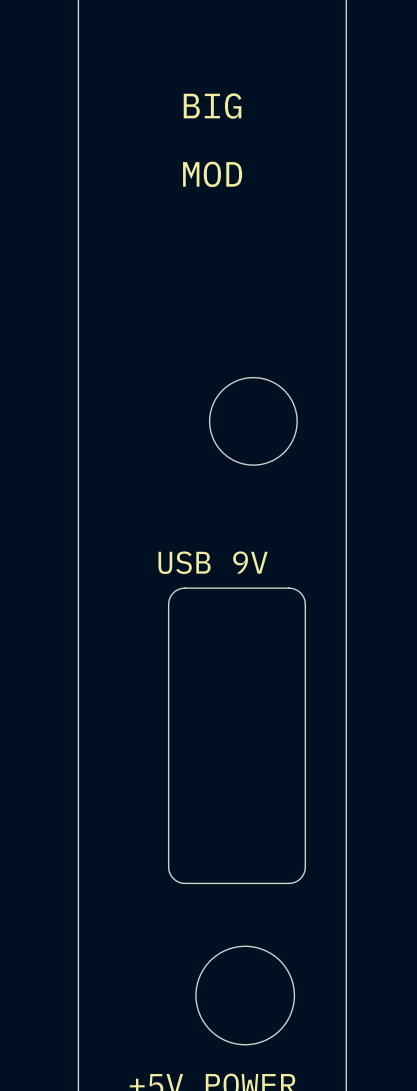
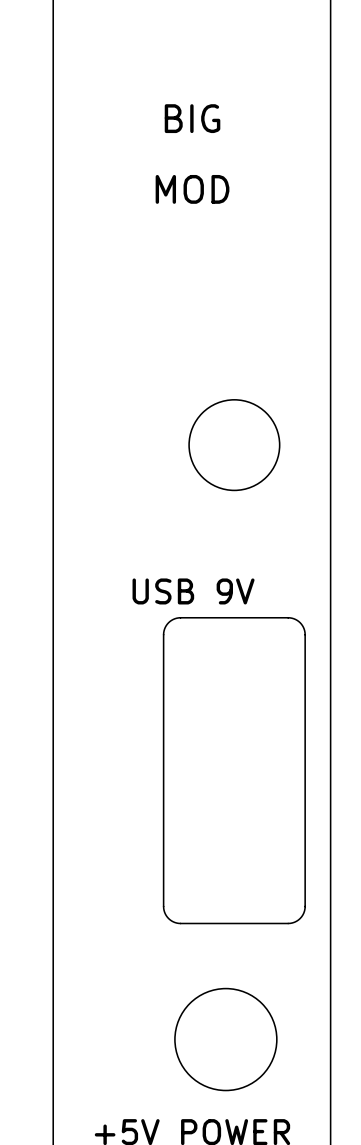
board edge: (201, 588) (177, 589) (171, 595) (168, 604) (168, 868) (171, 875) (177, 881) (201, 883) -> (180, 617) (168, 622) (163, 634) (163, 908) (170, 919) (180, 923)
board edge: (288, 588) (300, 592) (305, 604) (305, 868) (299, 879) (288, 883) -> (271, 617) (295, 619) (302, 625) (305, 634) (305, 908) (301, 916) (294, 922) (271, 923)

